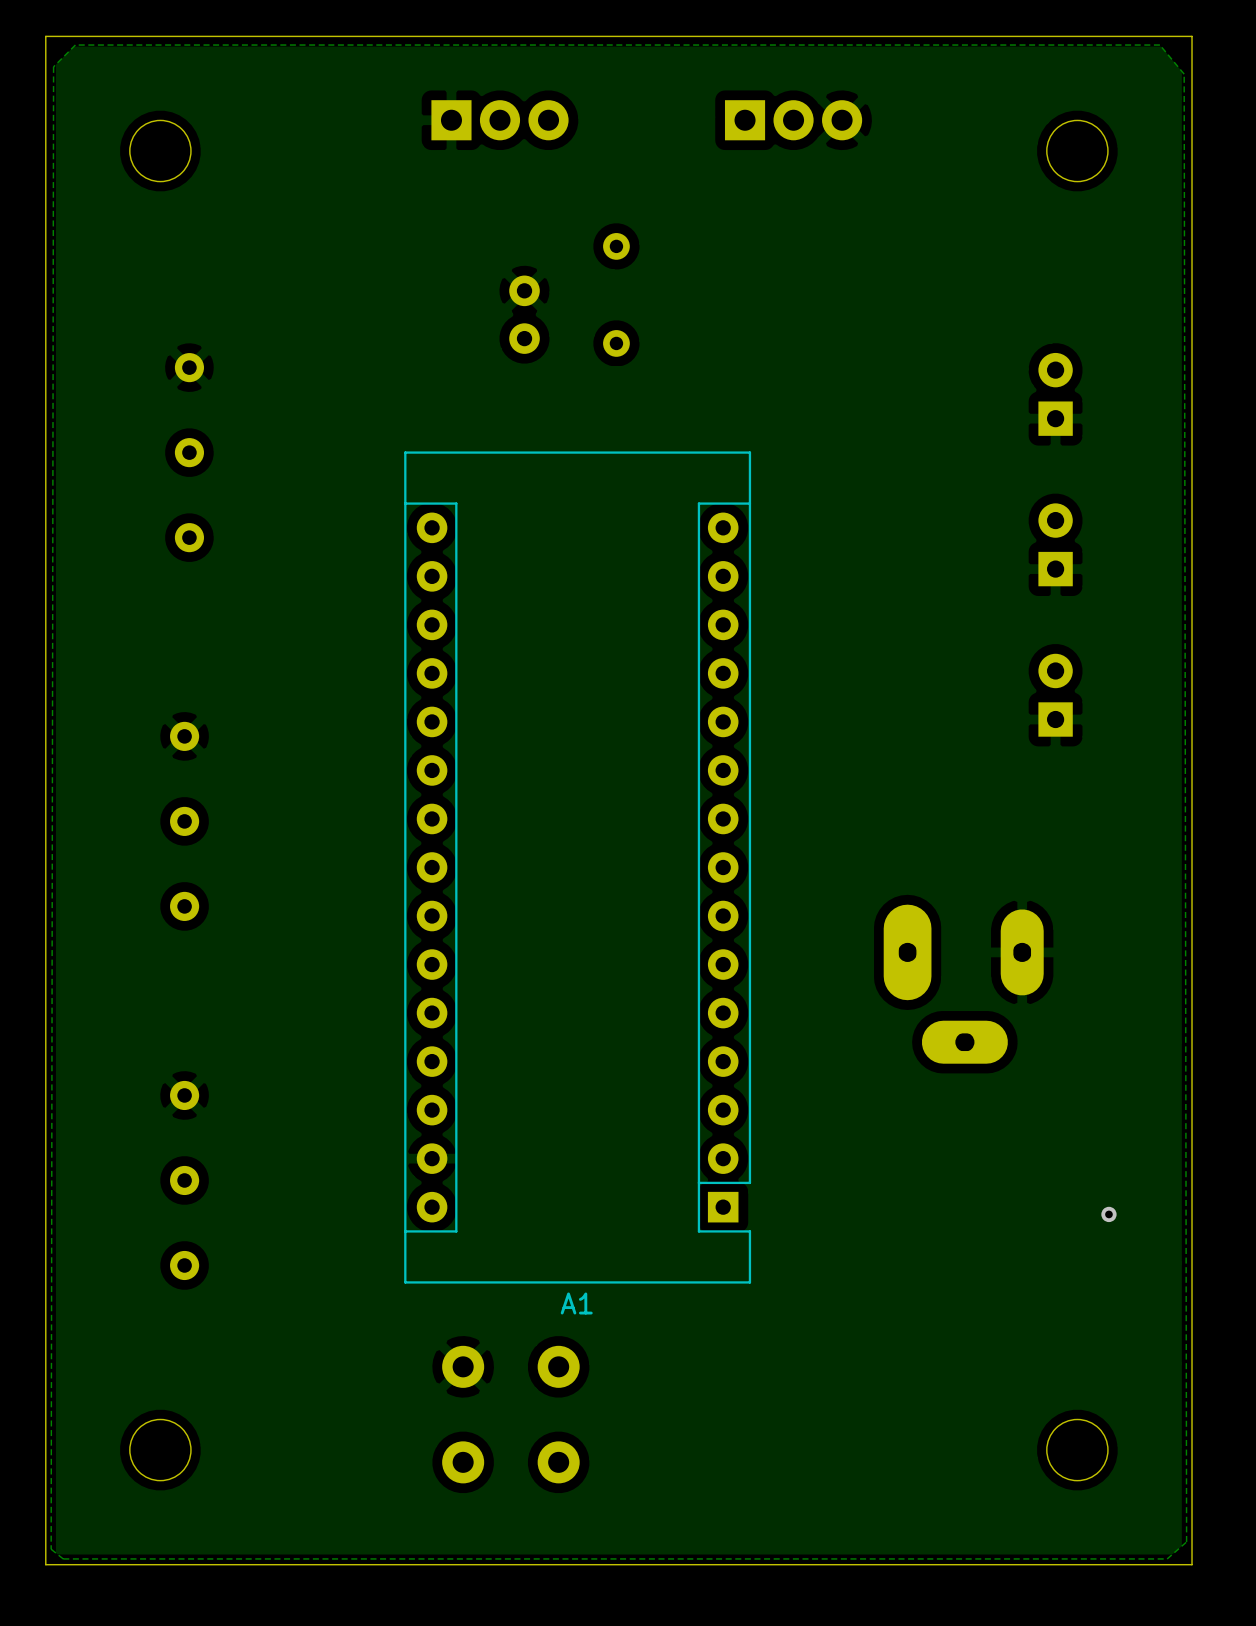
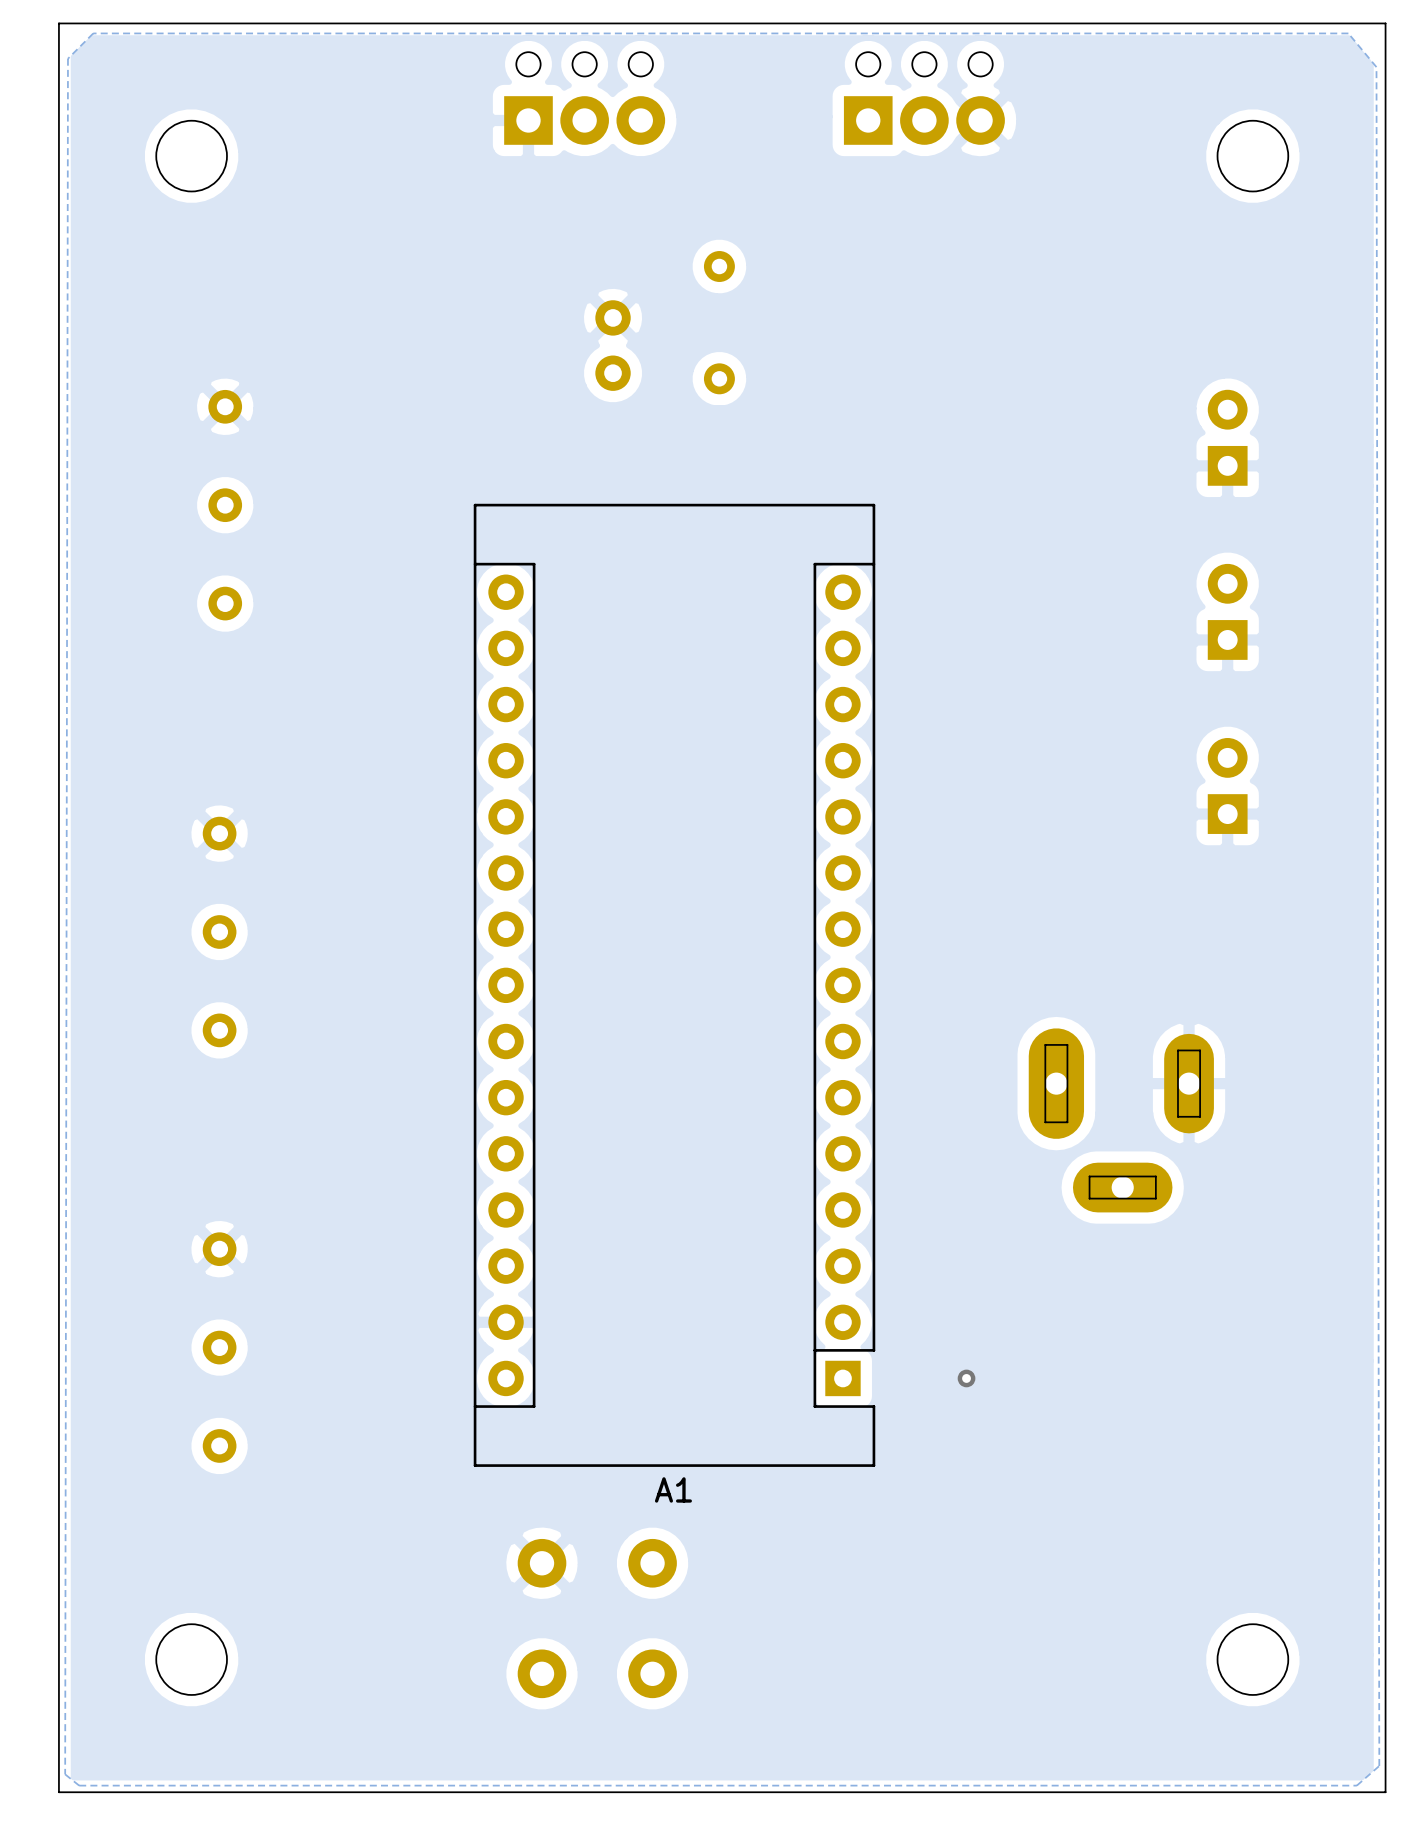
part footprint: [431, 100, 569, 141] -> [504, 52, 666, 145]
part footprint: [724, 100, 863, 141] -> [843, 52, 1005, 145]
via: none -> (966, 1378)
via: (1108, 1214) -> none

